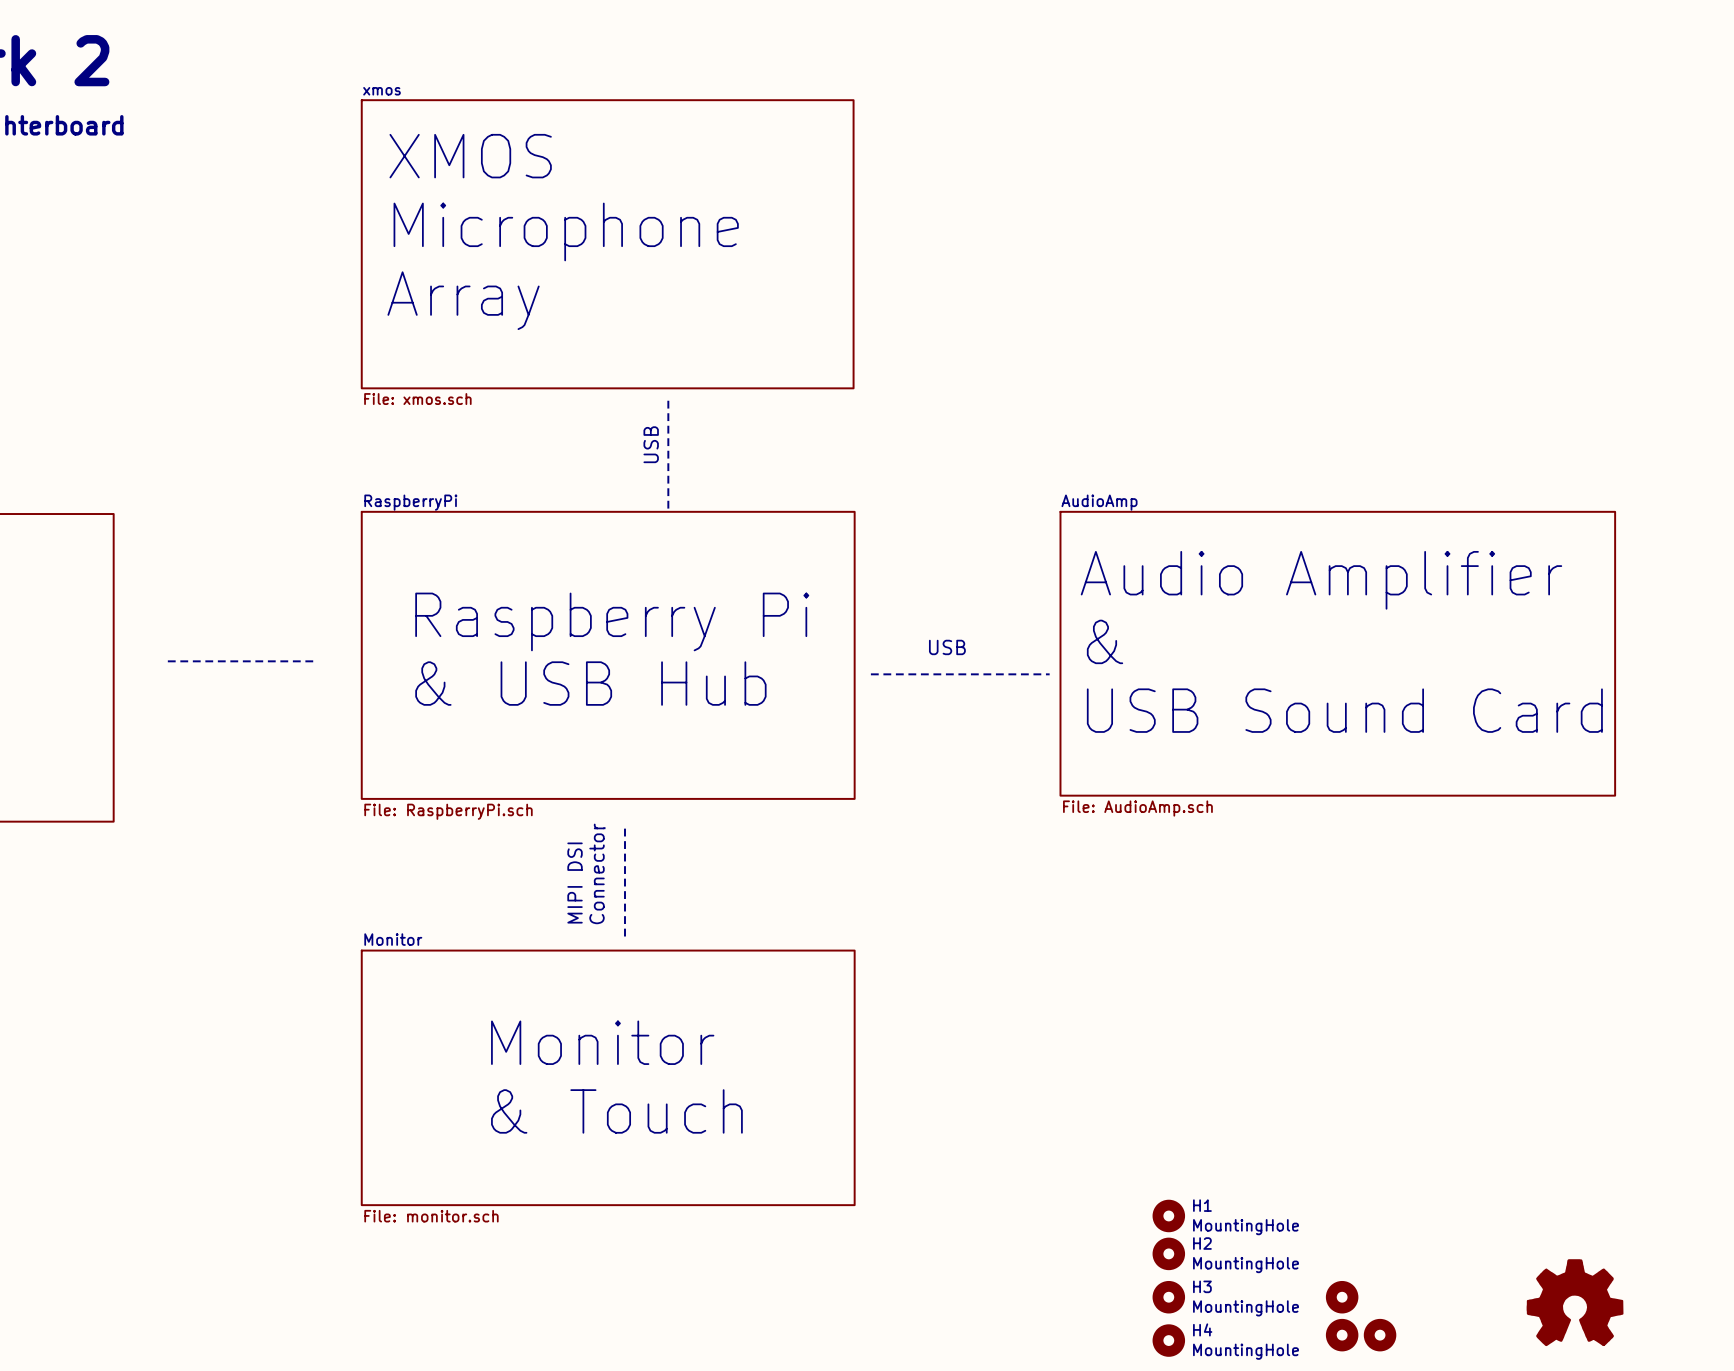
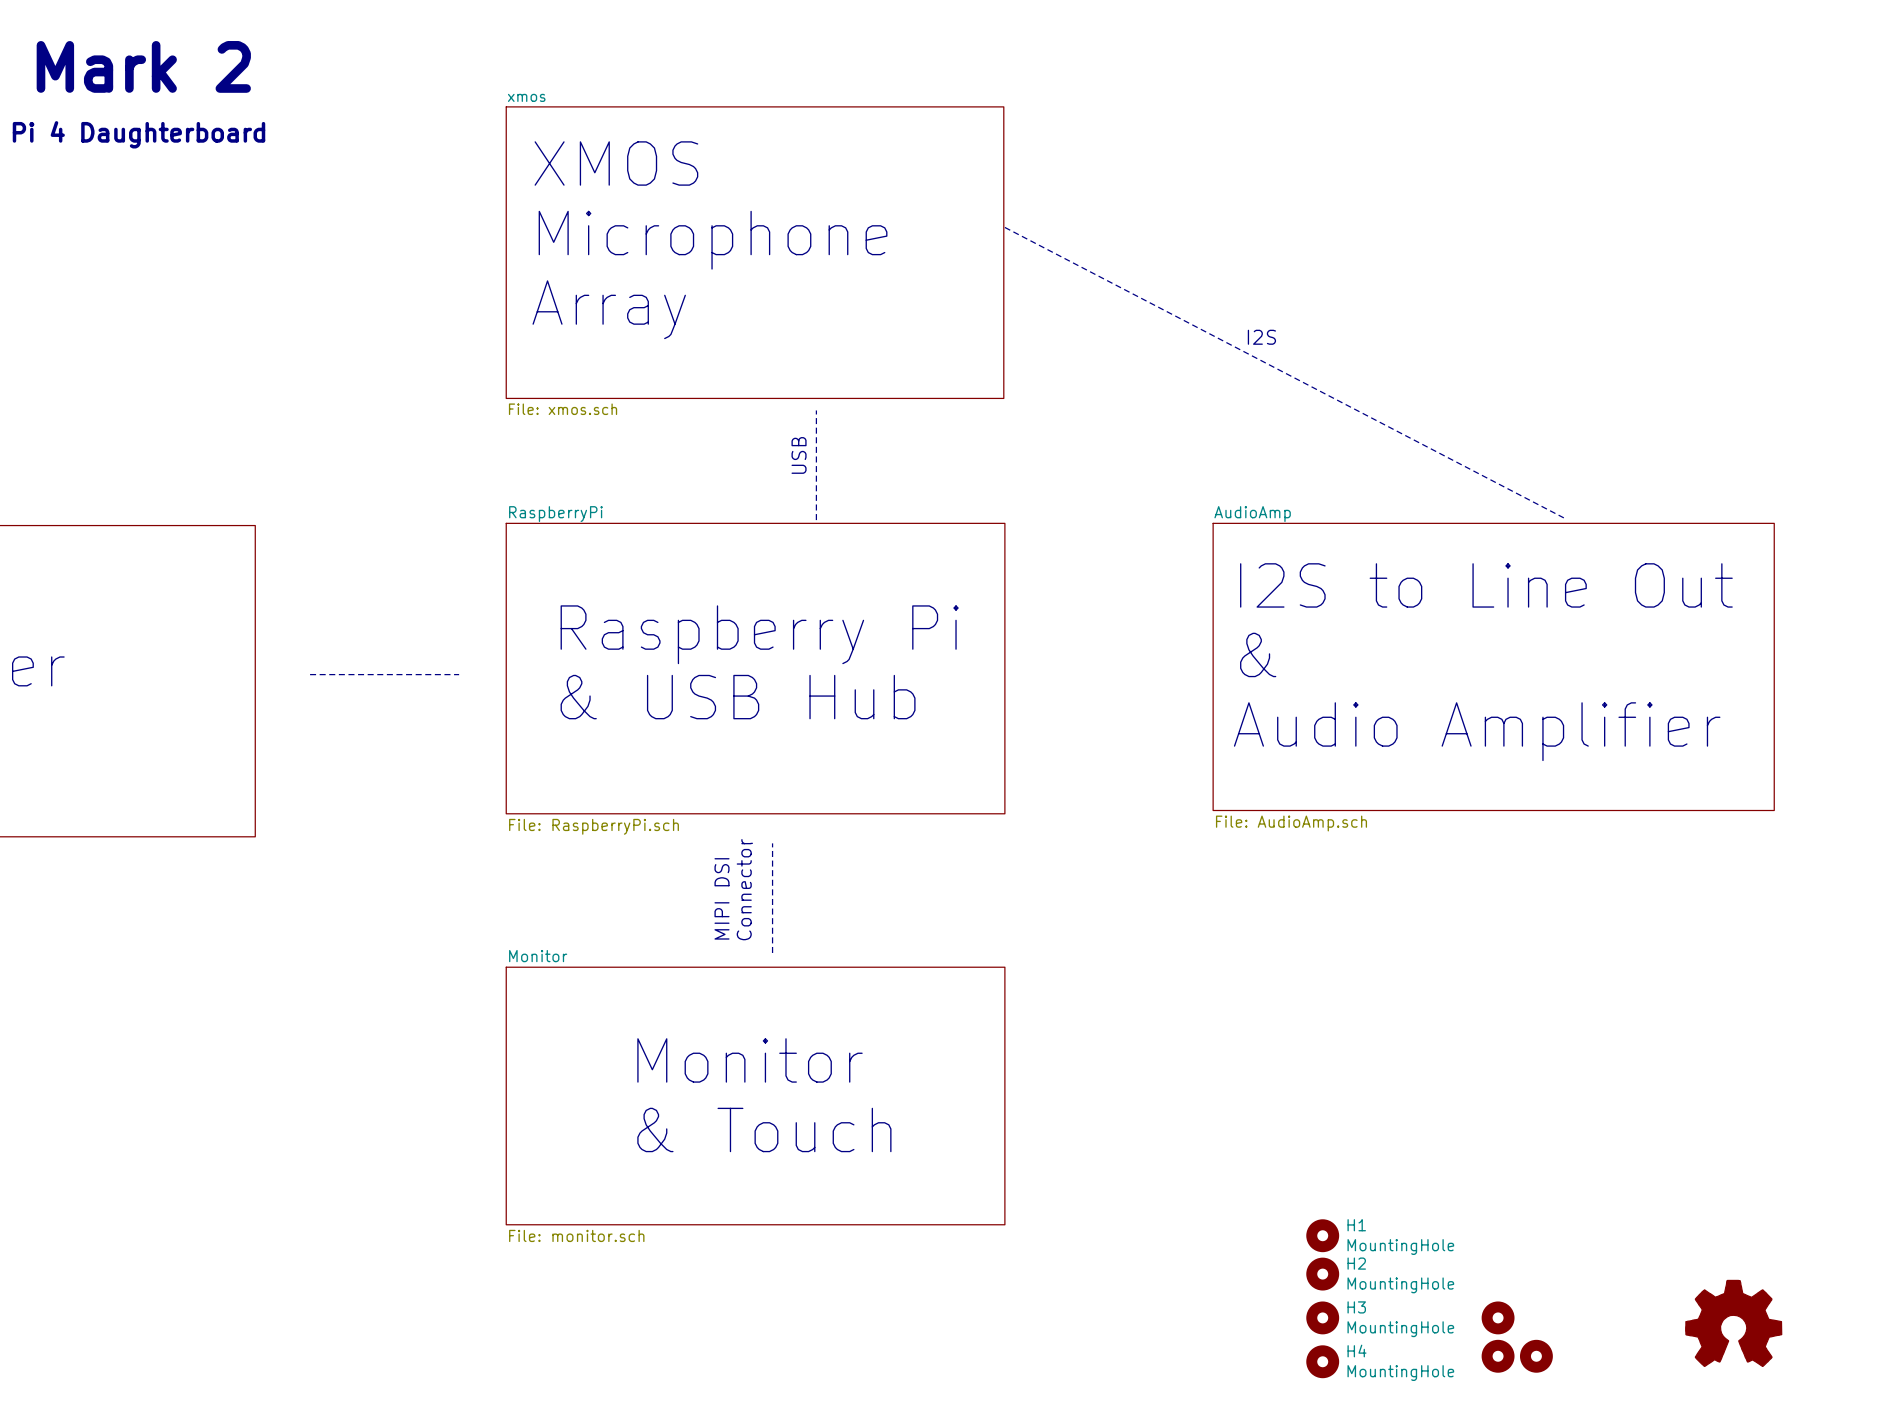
line: none -> (1004, 227) (1563, 517)
text: none -> I2S (1261, 337)
text: Audio Amplifier (1321, 580) -> I2S to Line Out (1486, 585)
text: USB (947, 647) -> none
line: (870, 674) (1049, 674) -> none
text: USB Sound Card (1344, 710) -> Audio Amplifier (1477, 731)

